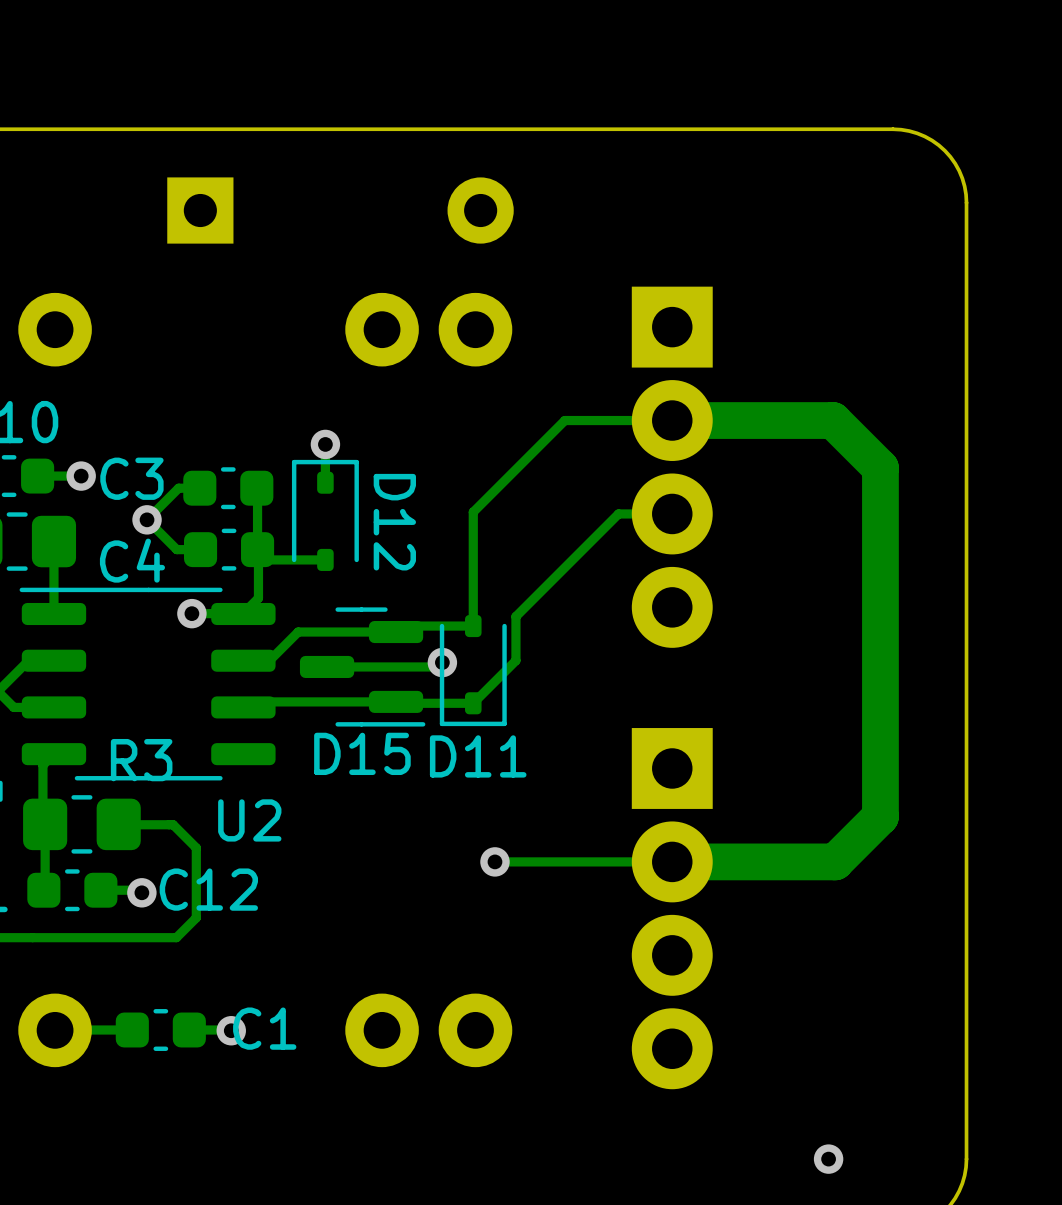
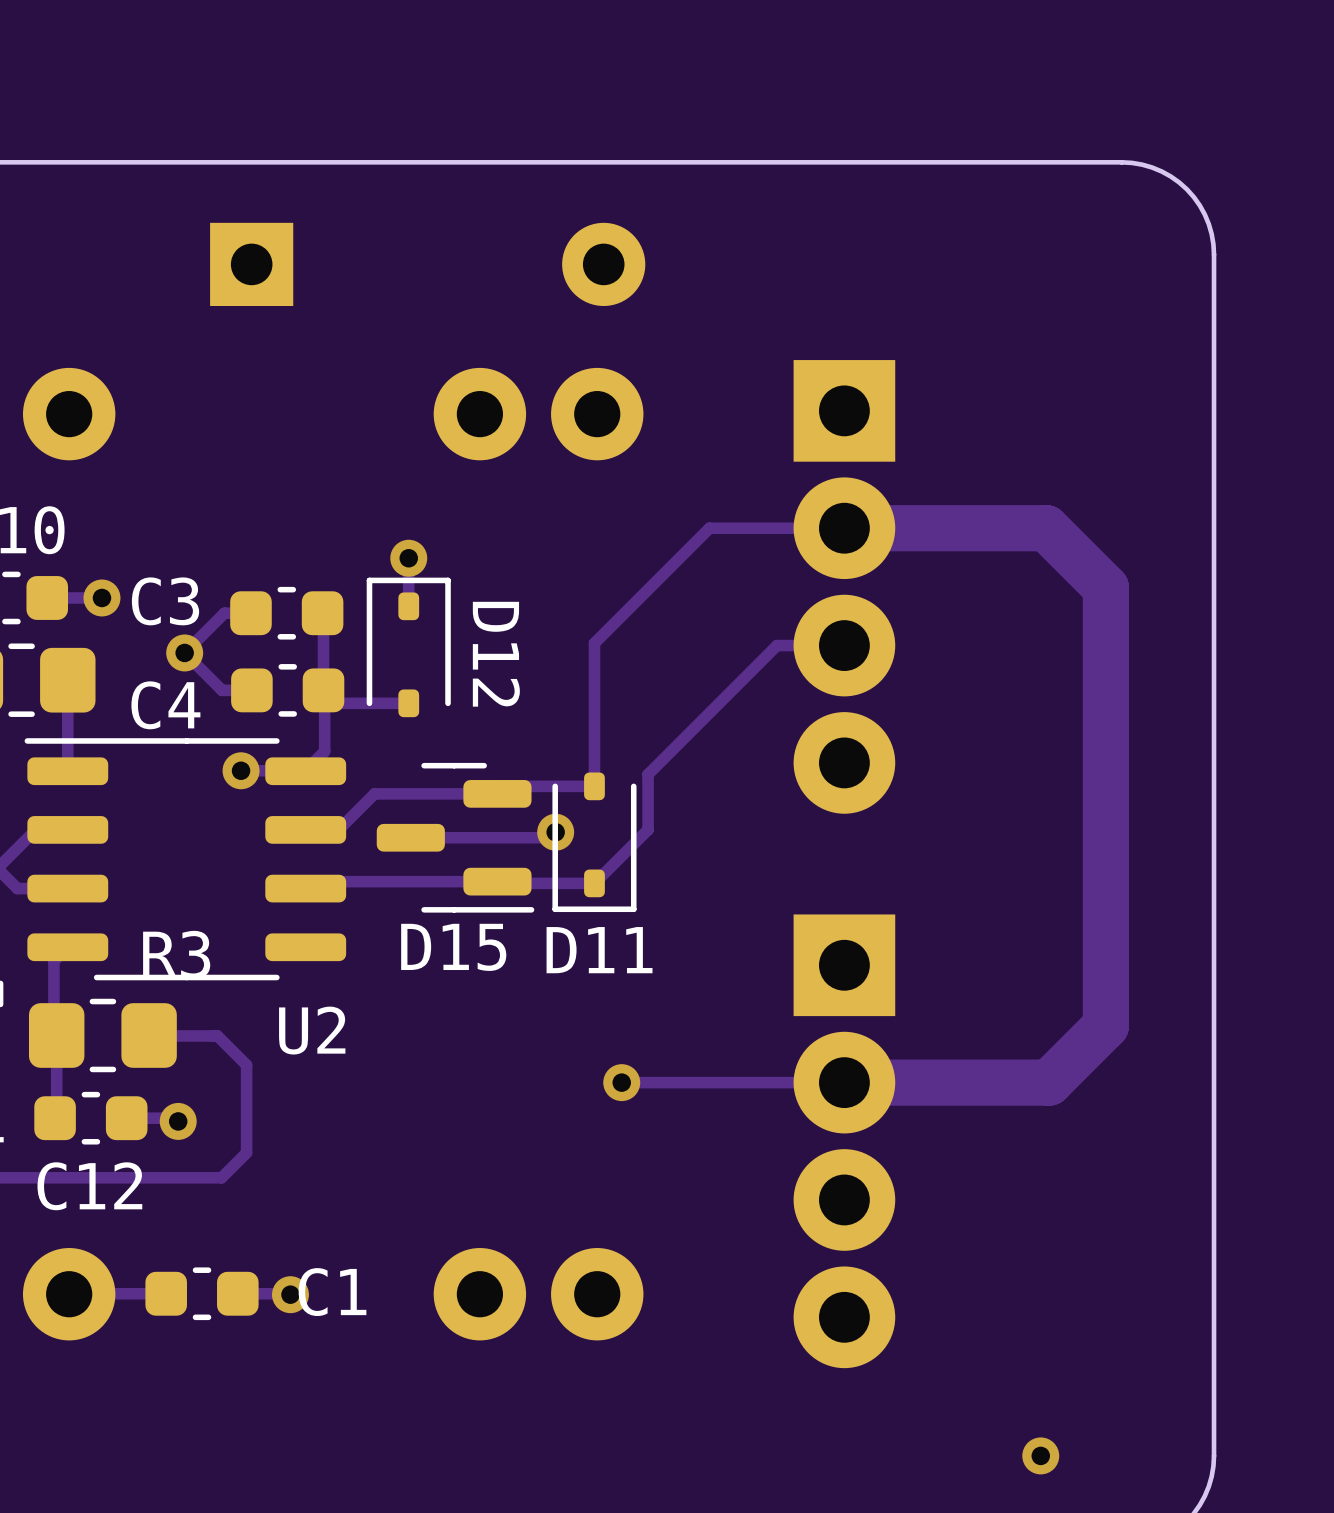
C12 name position: C12 (208, 889) -> C12 (89, 1186)

